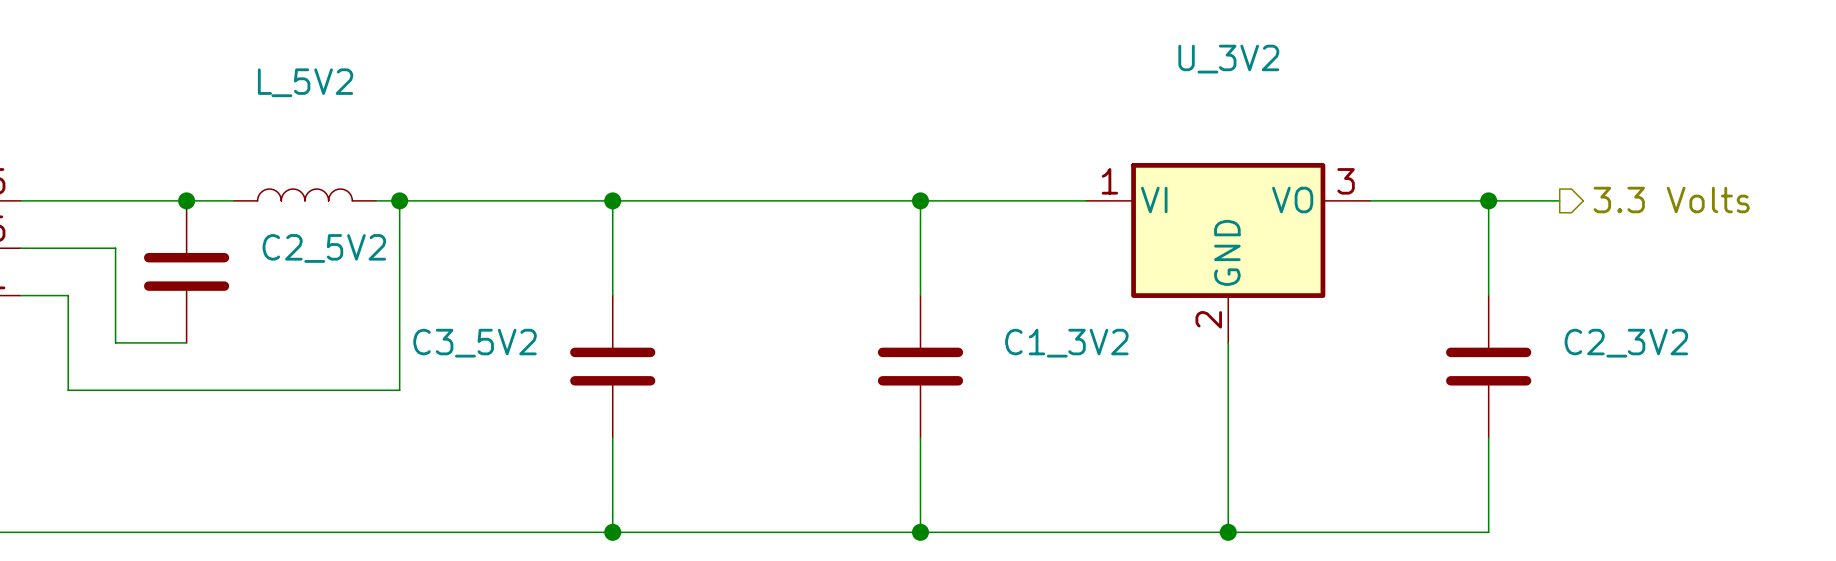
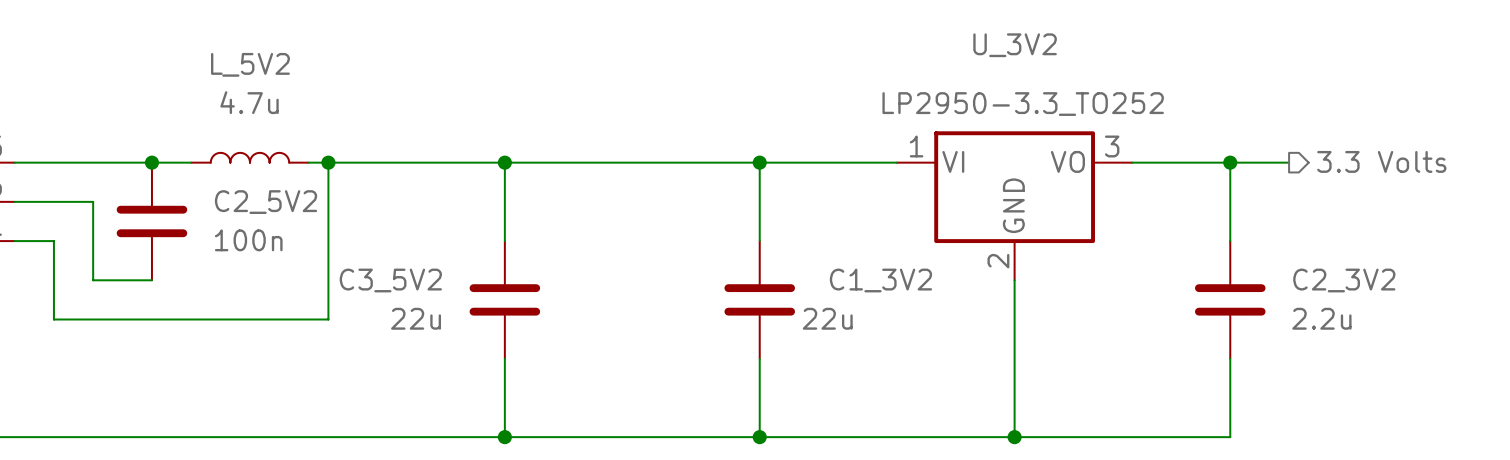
L_5V2 value: none -> 4.7u (249, 102)
U_3V2 value: none -> LP2950-3.3_TO252 (1023, 104)
C2_5V2 value: none -> 100n (248, 240)
C3_5V2 value: none -> 22u (416, 318)
C1_3V2 value: none -> 22u (827, 318)
C2_3V2 value: none -> 2.2u (1321, 318)

